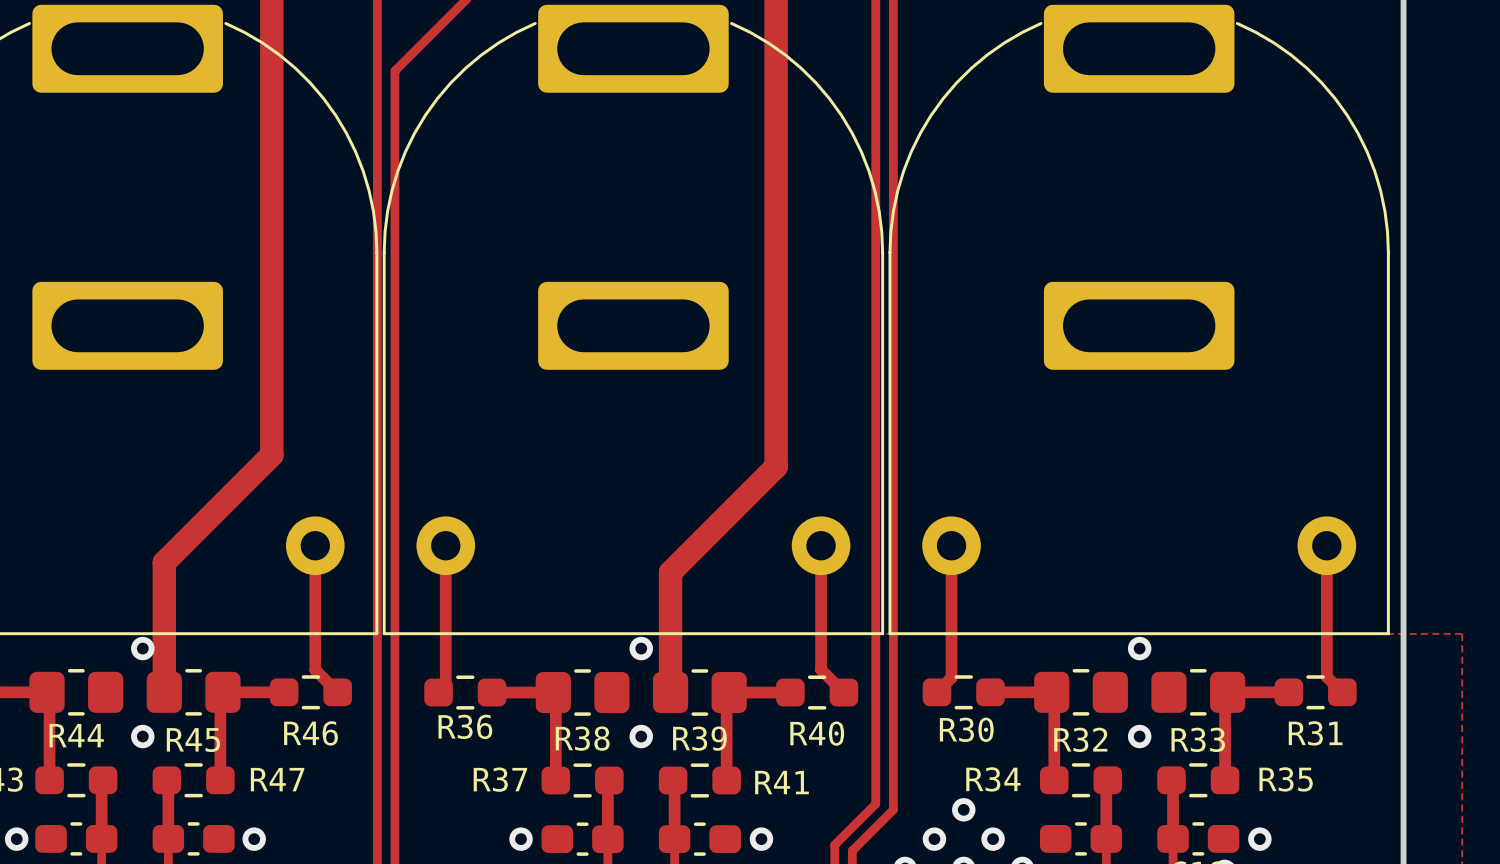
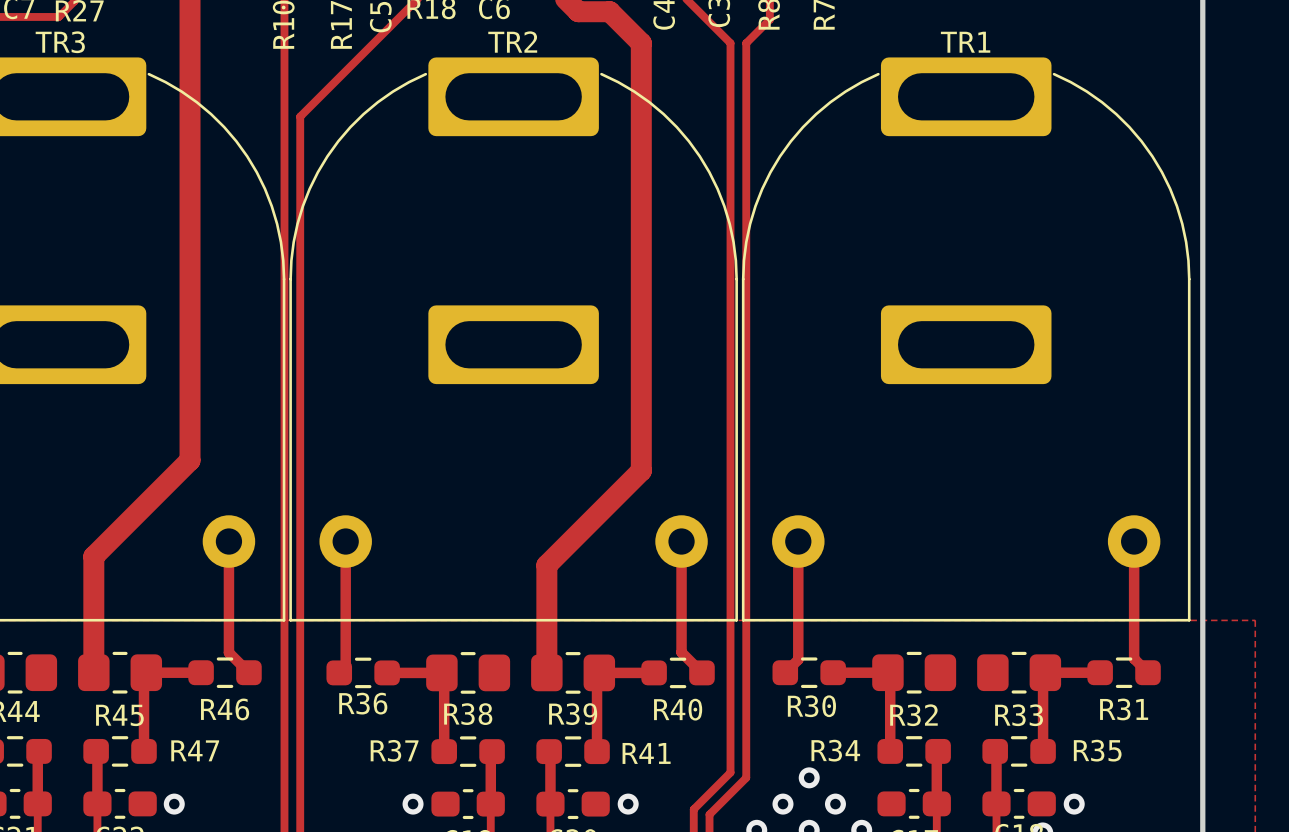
via: (142, 648) -> none
via: (641, 648) -> none
via: (1139, 648) -> none
via: (142, 736) -> none
via: (641, 736) -> none
via: (1139, 736) -> none

